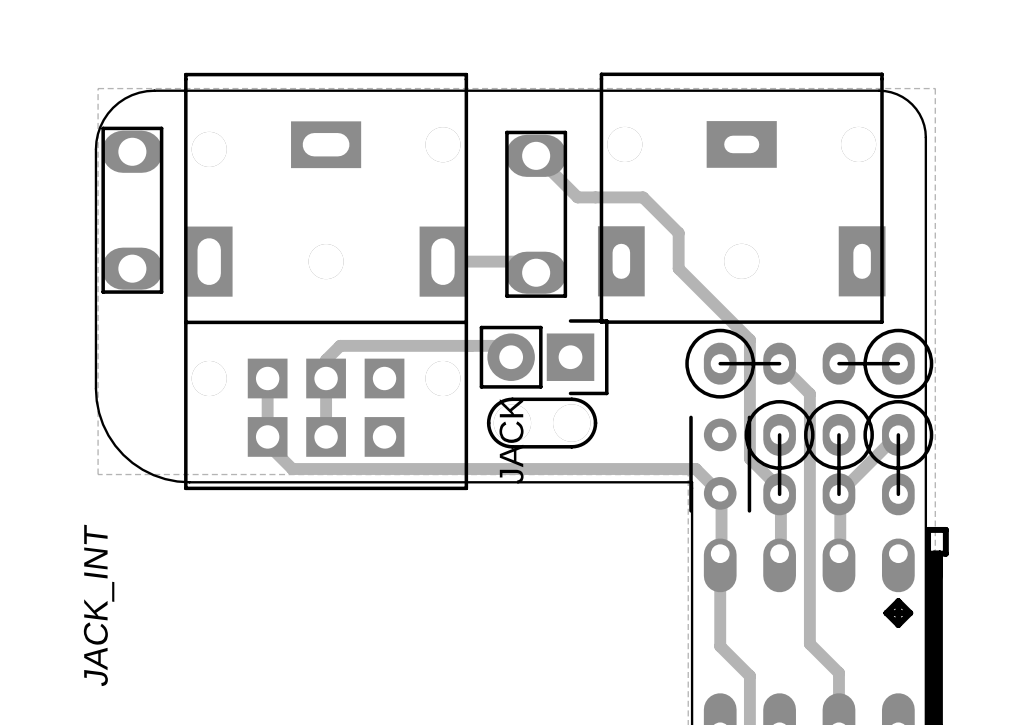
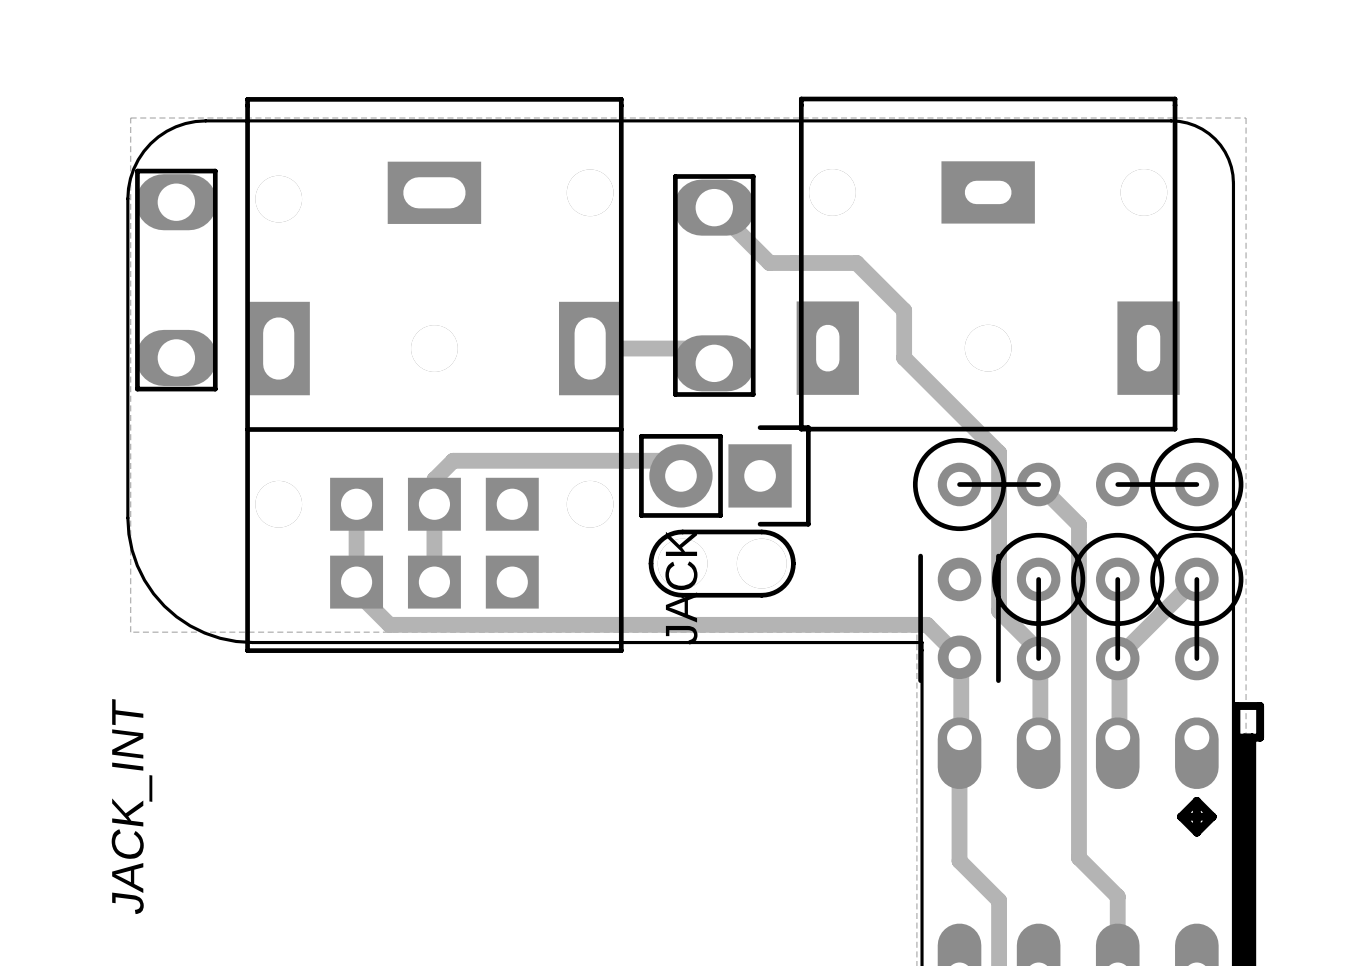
part footprint: [685, 328, 796, 399] -> [912, 437, 1061, 532]
part footprint: [822, 328, 934, 399] -> [1095, 437, 1244, 532]
part footprint: [744, 399, 815, 516] -> [992, 532, 1086, 681]
part footprint: [804, 399, 874, 516] -> [1071, 532, 1165, 681]
part footprint: [863, 399, 934, 516] -> [1150, 532, 1244, 681]

